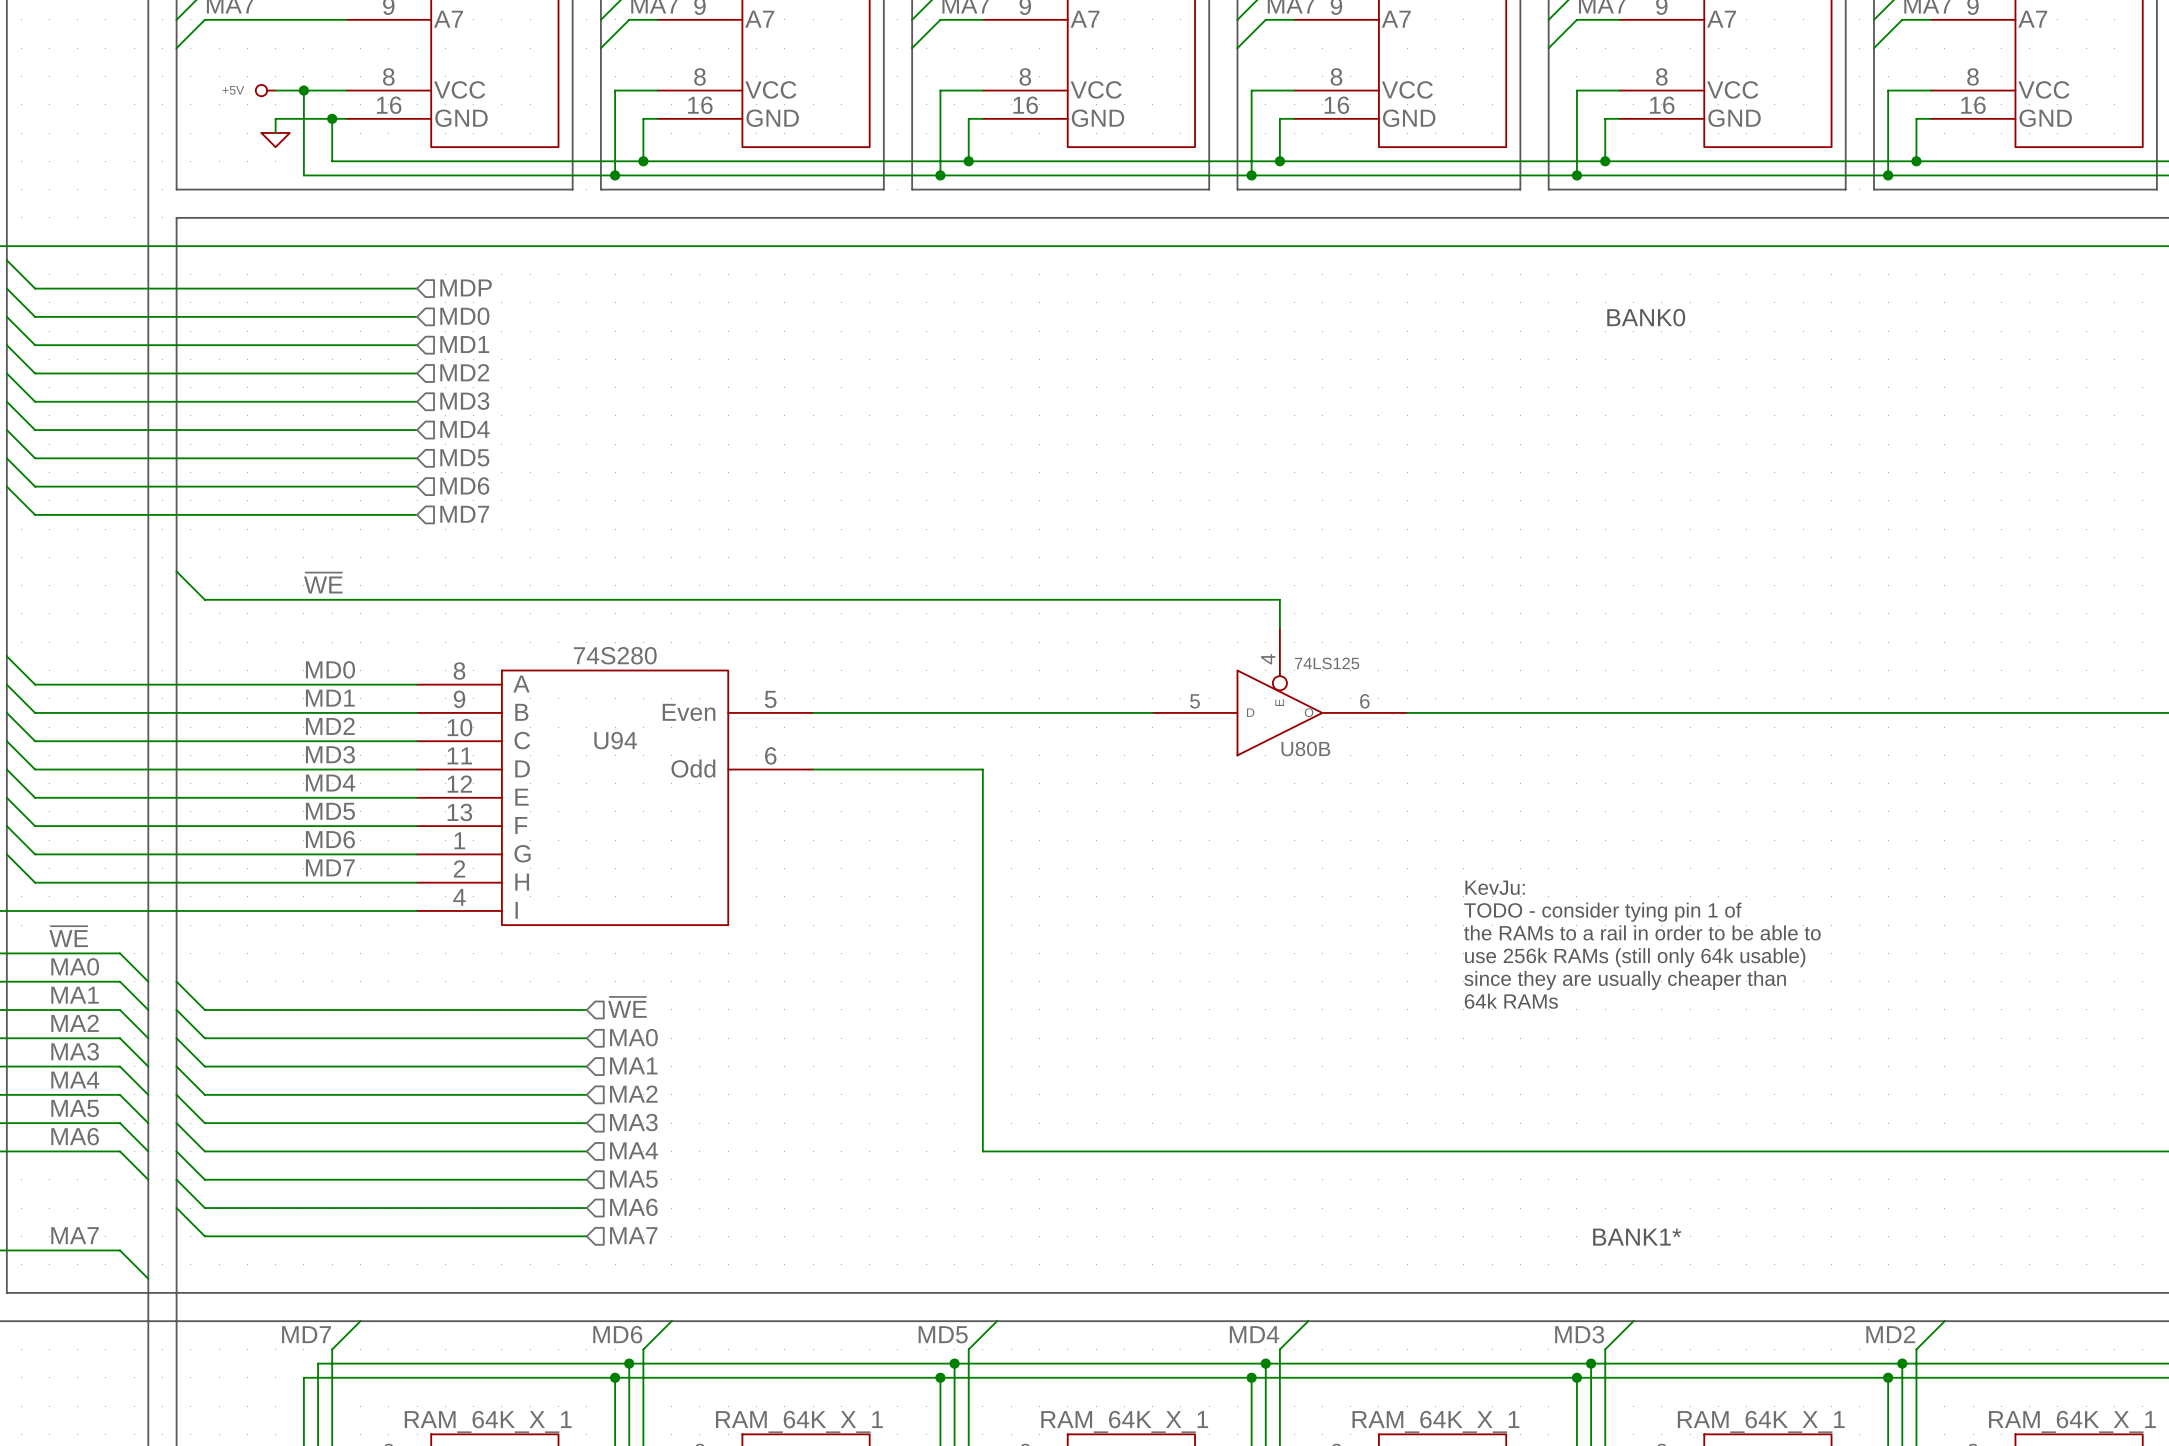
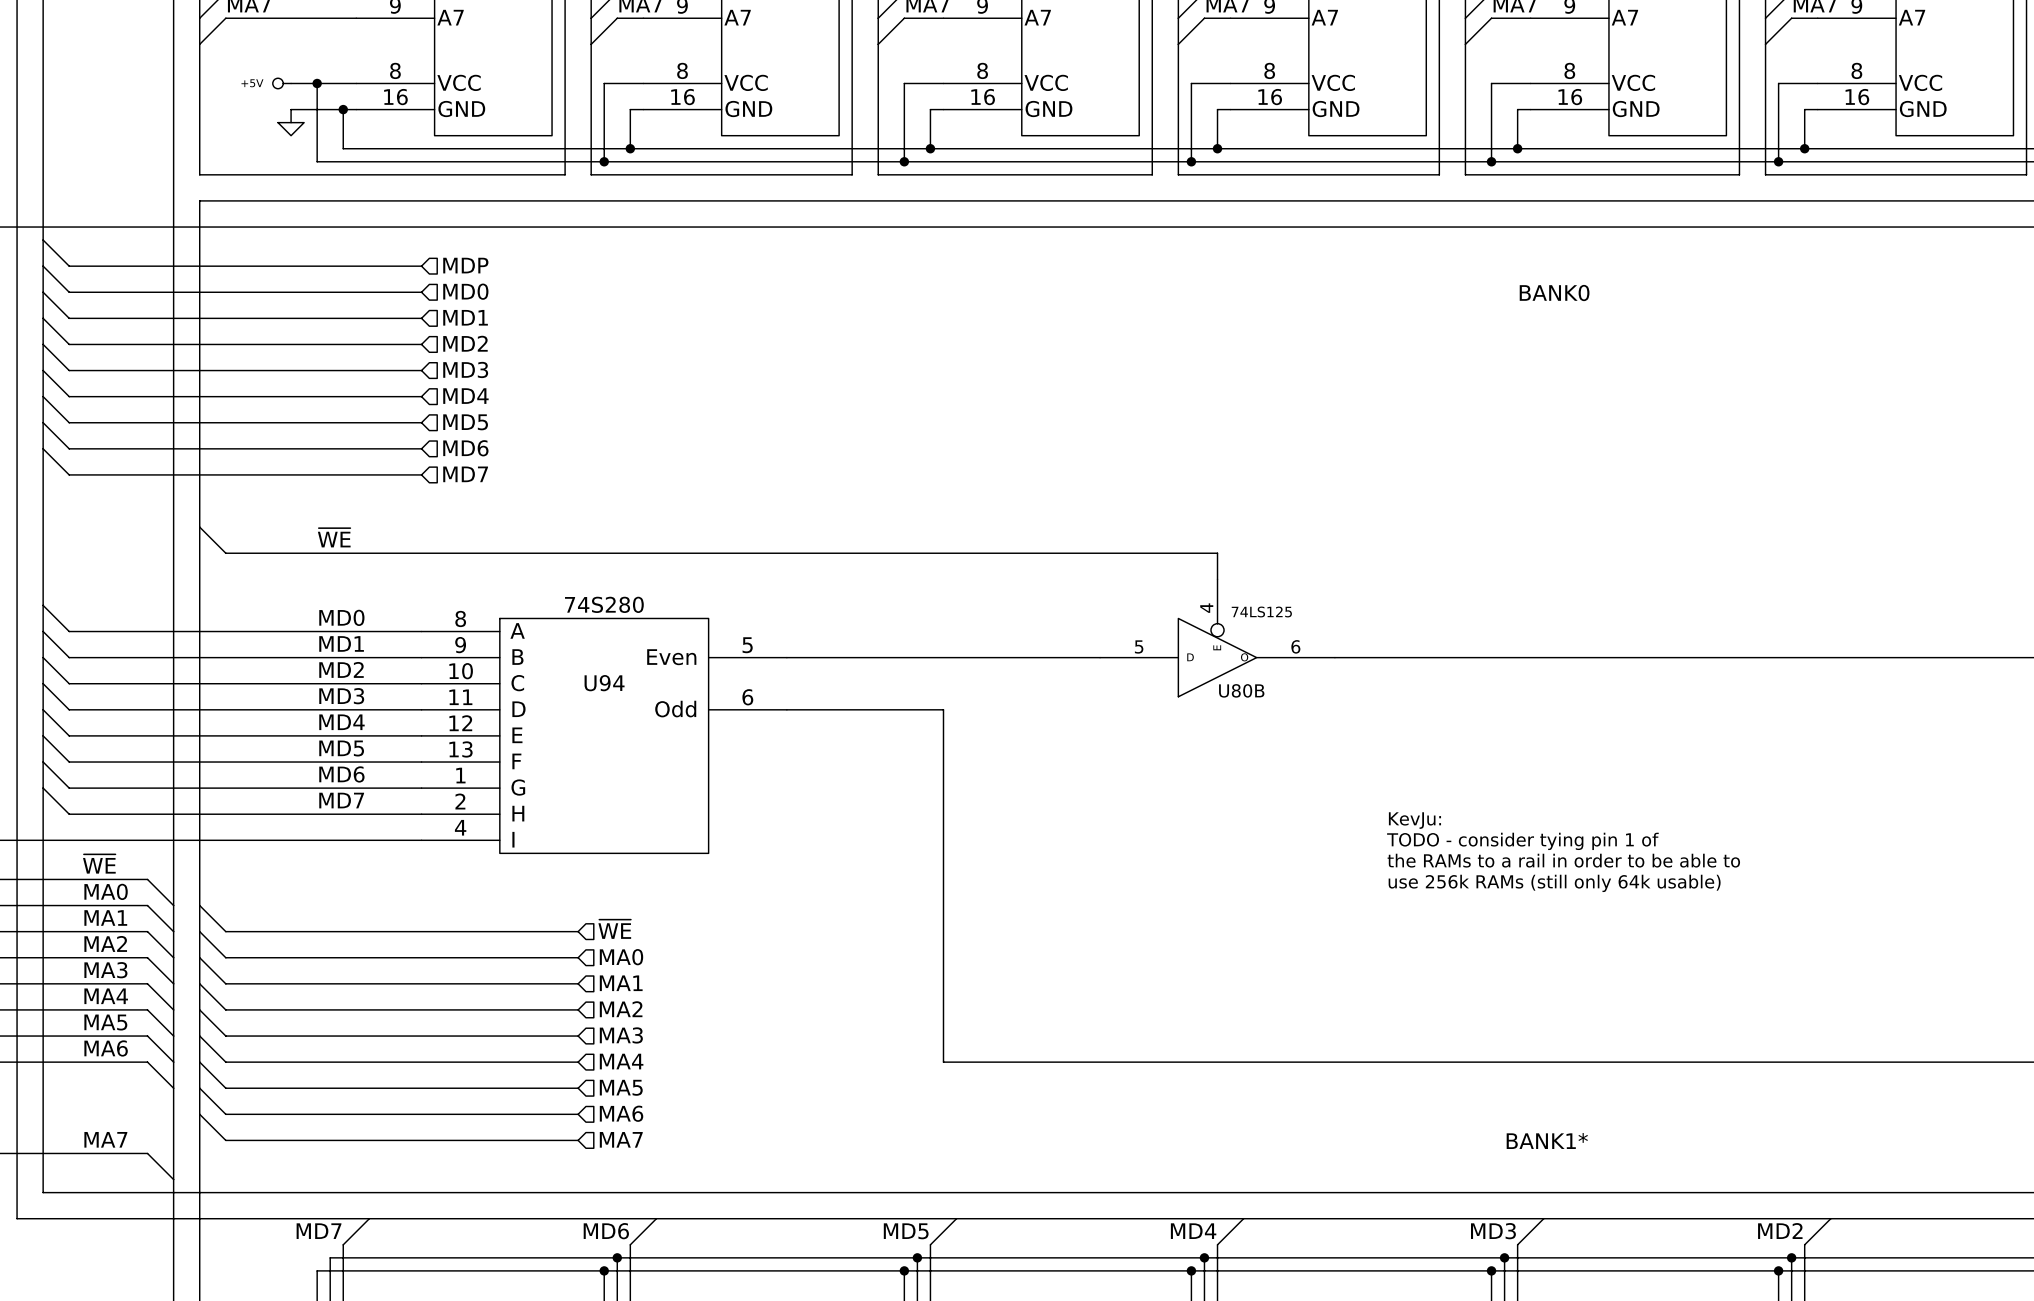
text: since they are usually cheaper than (1625, 980) -> none
text: 64k RAMs (1511, 1001) -> none

